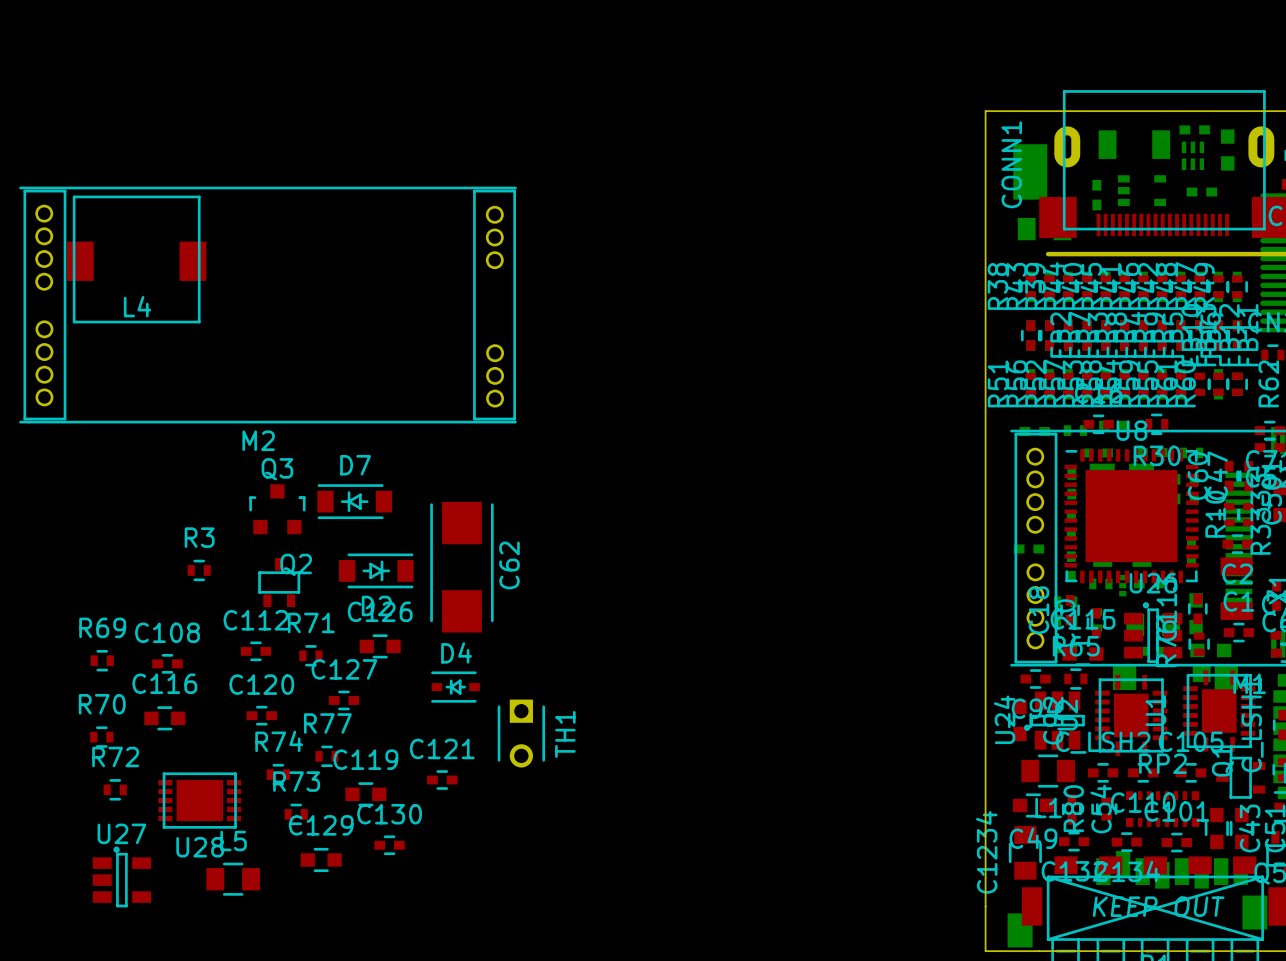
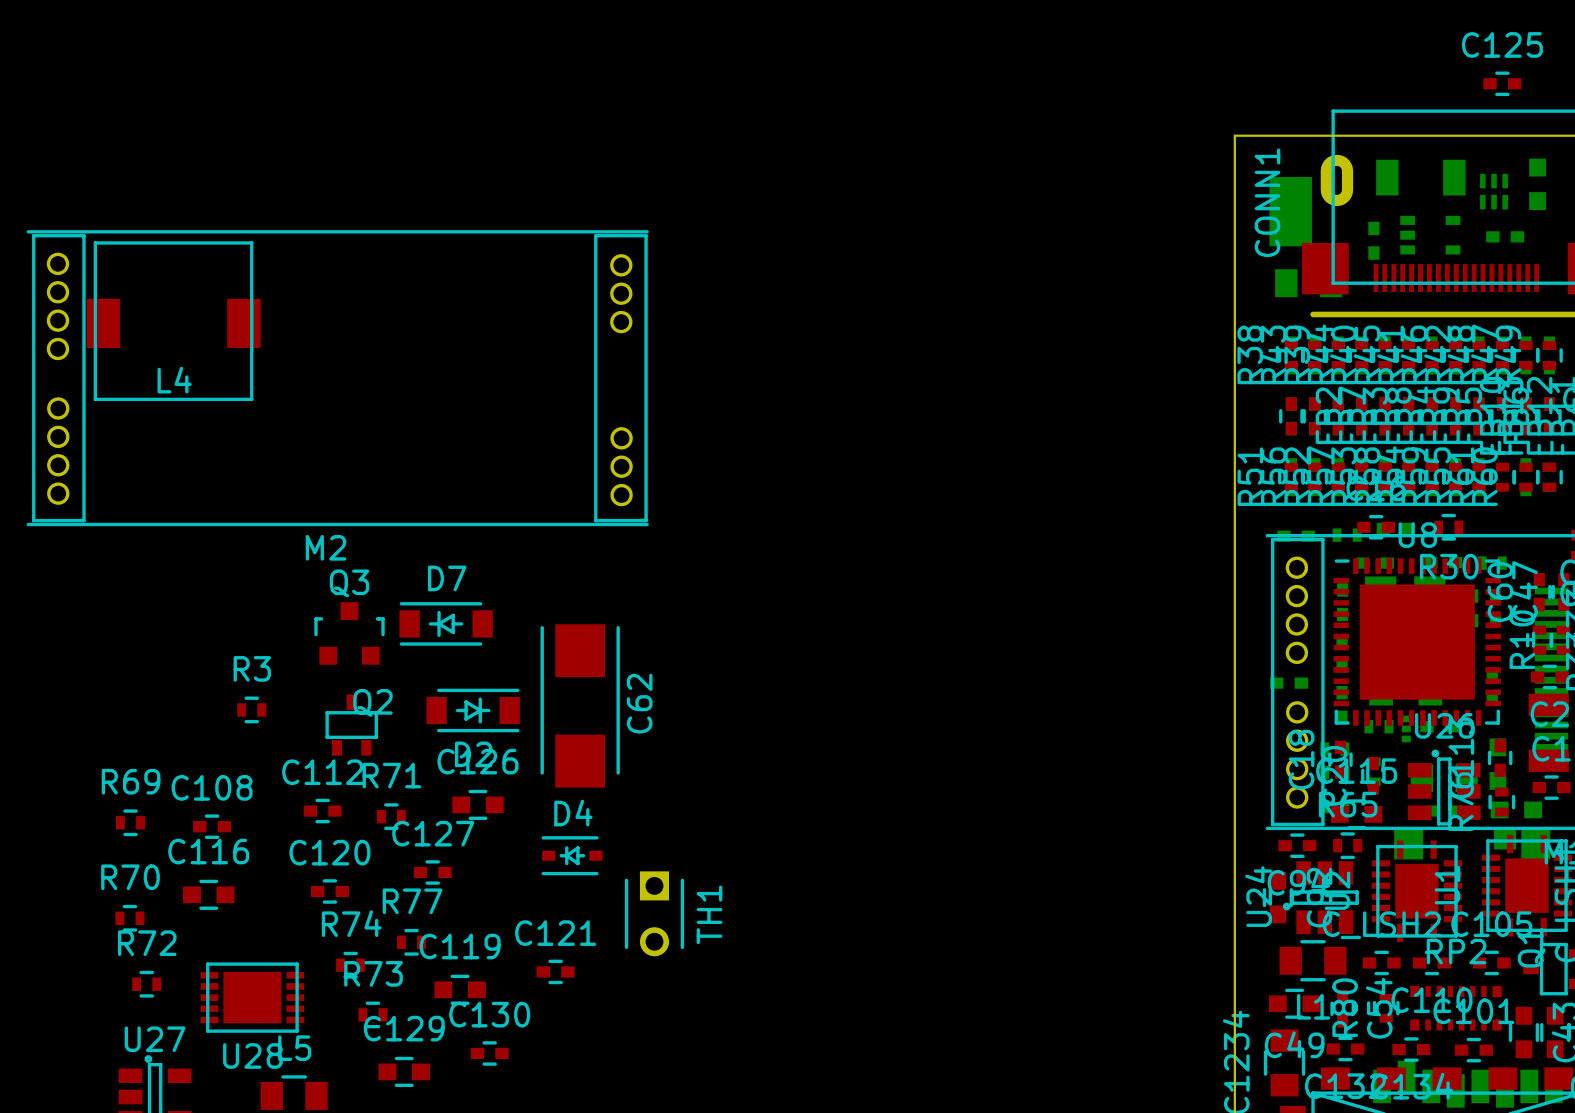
C125 side: bottom (1194, 129) -> top (1502, 83)

